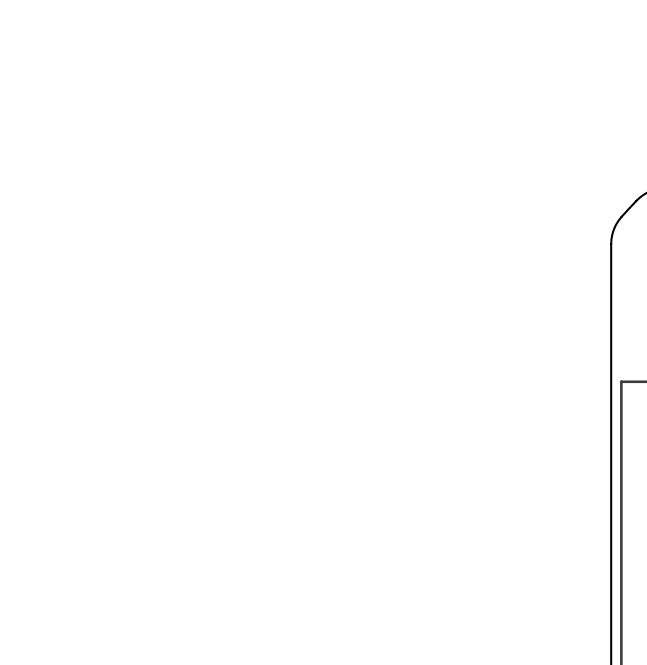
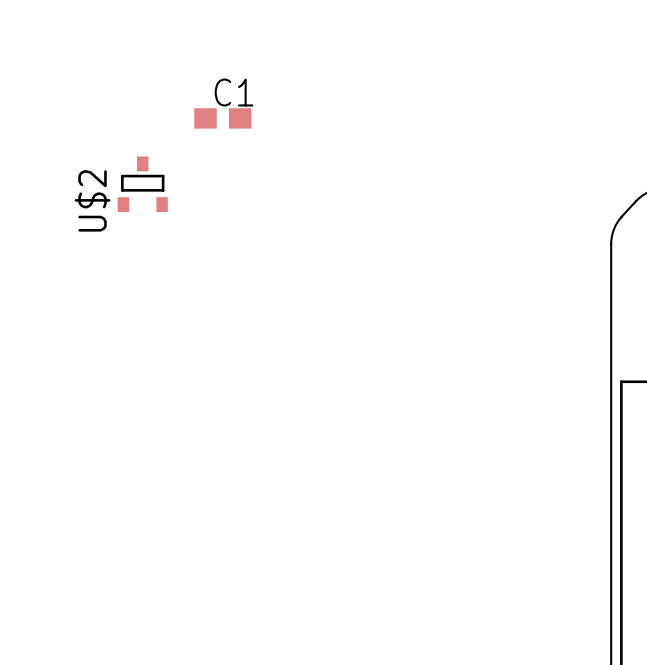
C1: none -> (222, 118)
U$2: none -> (142, 184)

